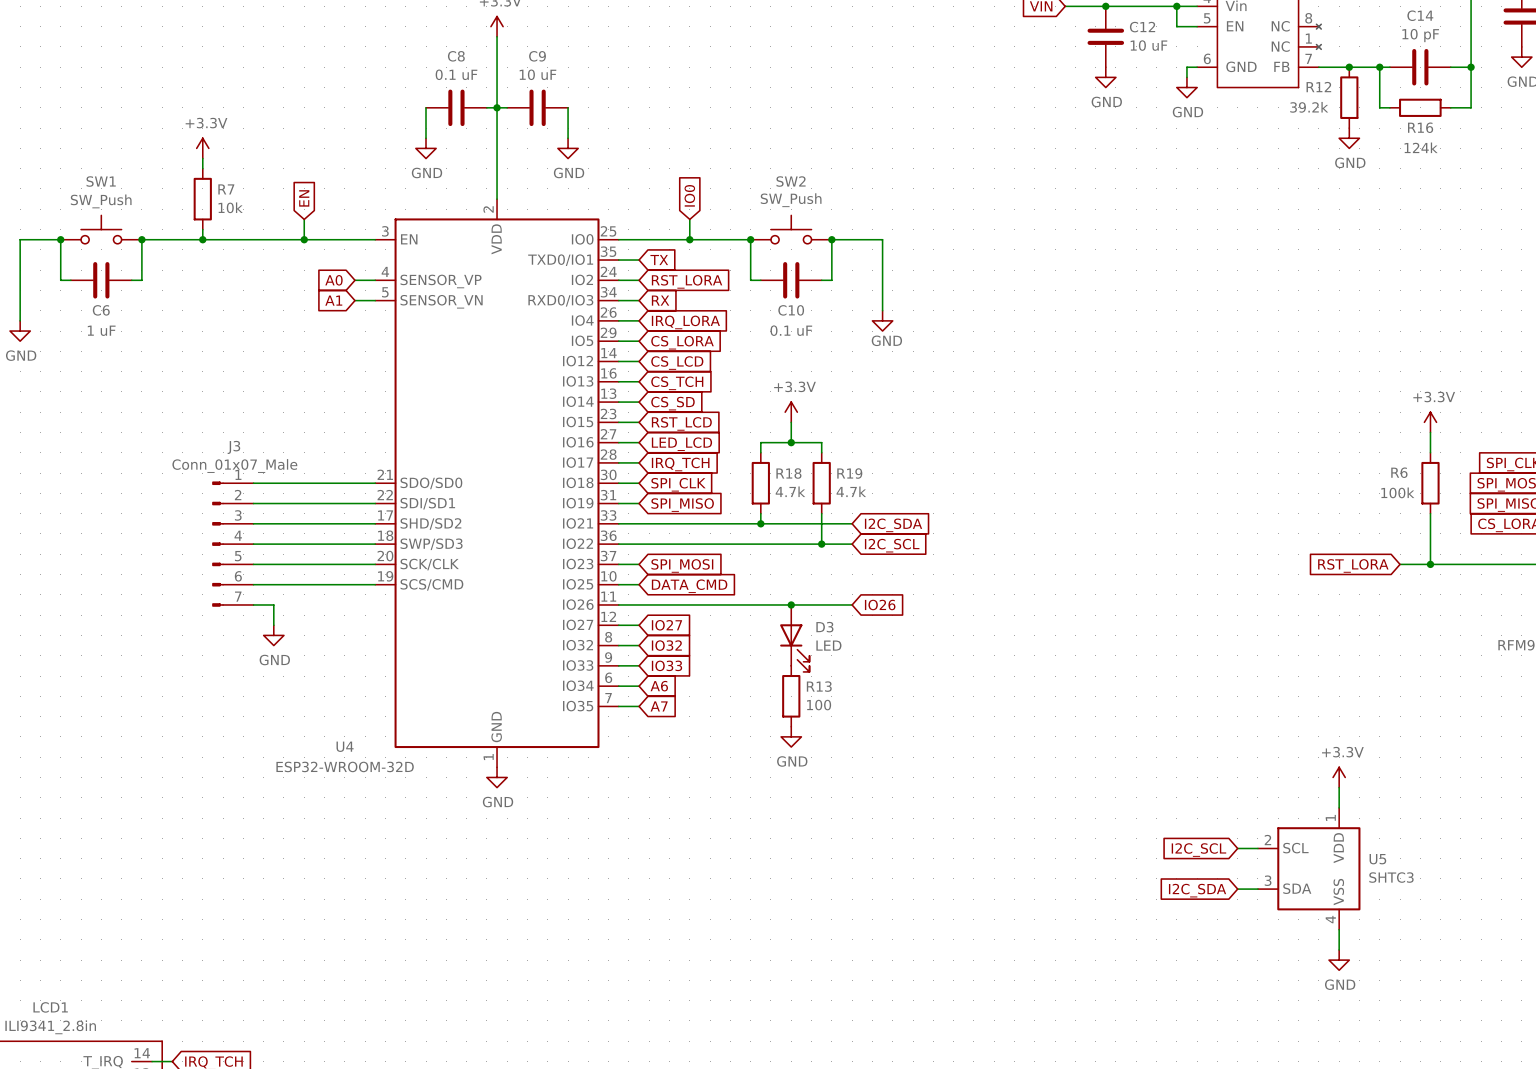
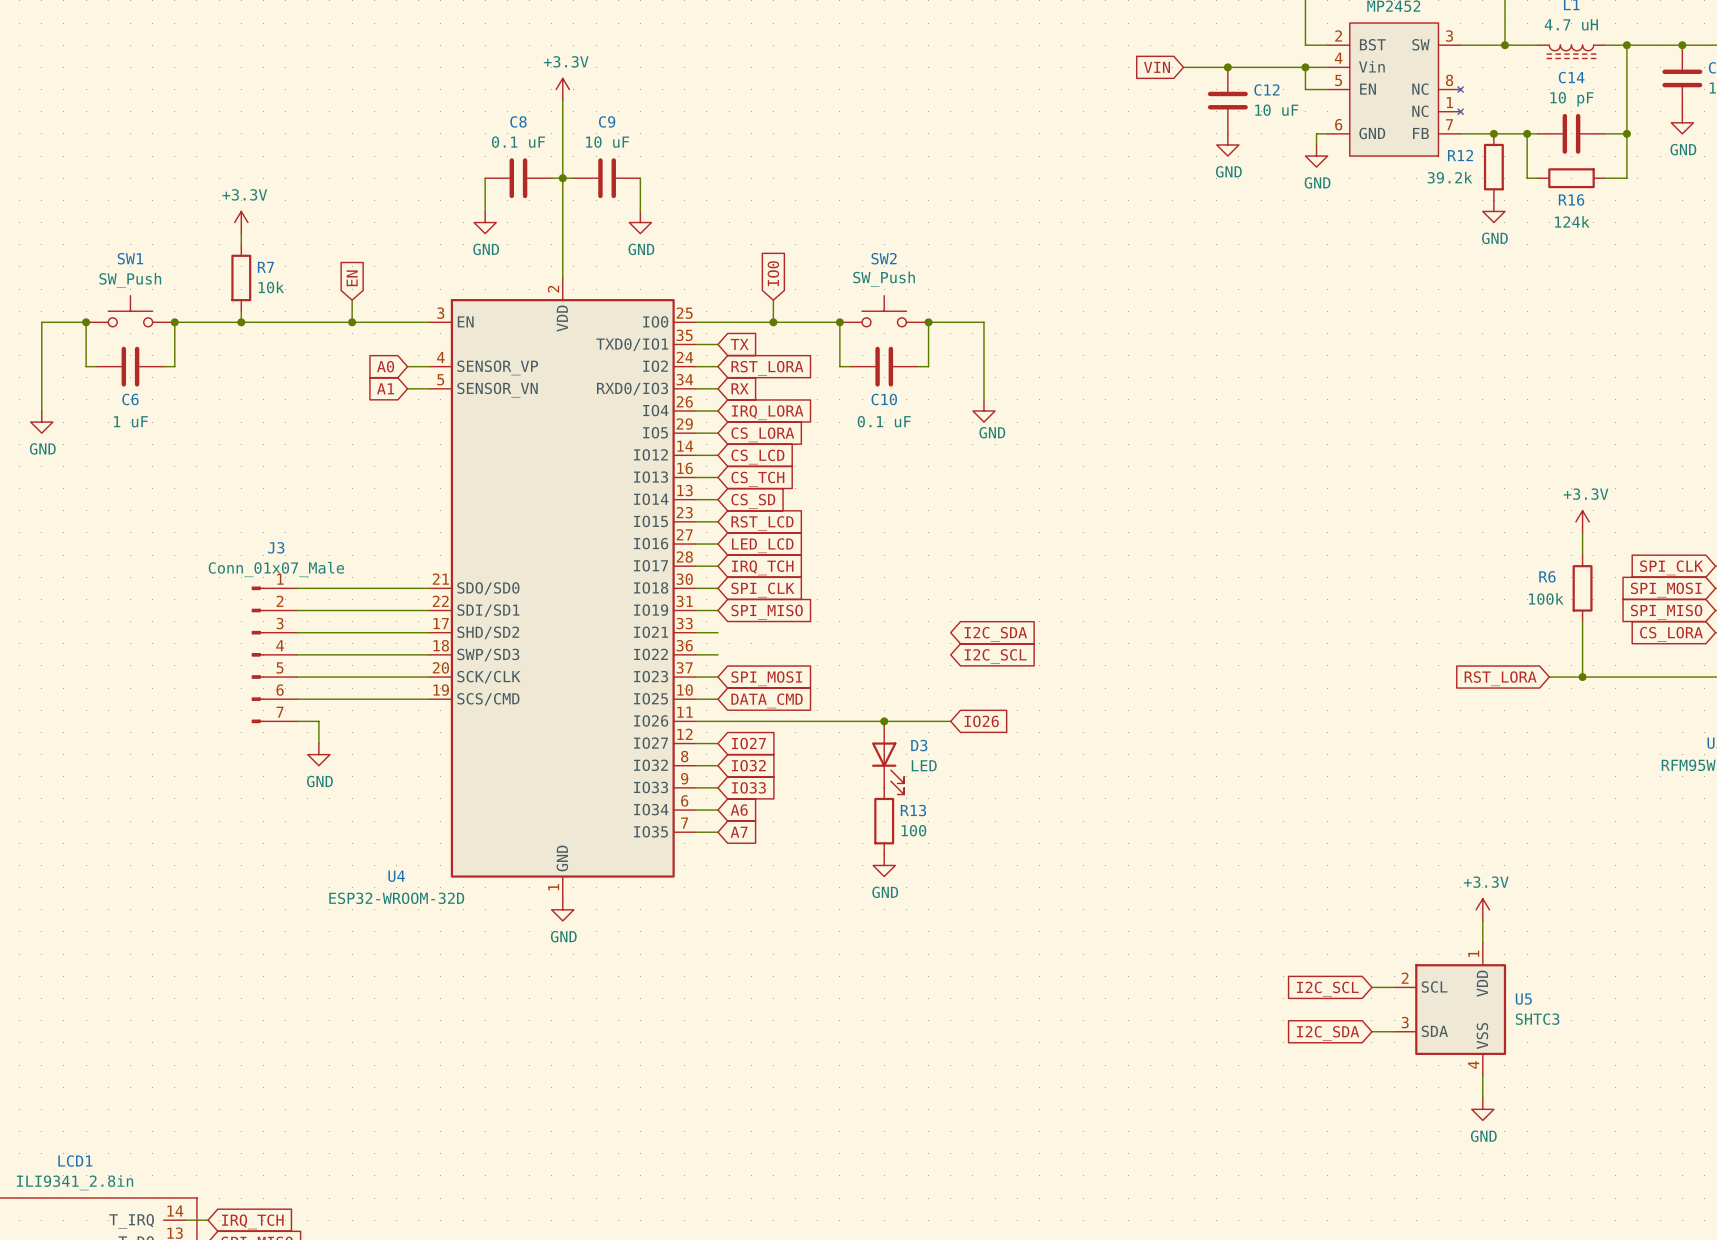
power symbol: +3.3V (791, 412) -> none
wire: (791, 422) (791, 442) -> none
junction: (791, 442) -> none
wire: (760, 452) (760, 442) (821, 442) (821, 452) -> none
R18: 4.7k (760, 483) -> none
R19: 4.7k (821, 483) -> none
wire: (760, 513) (760, 523) -> none
wire: (821, 513) (821, 544) -> none
wire: (639, 523) (852, 523) -> none
junction: (760, 523) -> none
wire: (639, 544) (852, 544) -> none
junction: (821, 544) -> none

